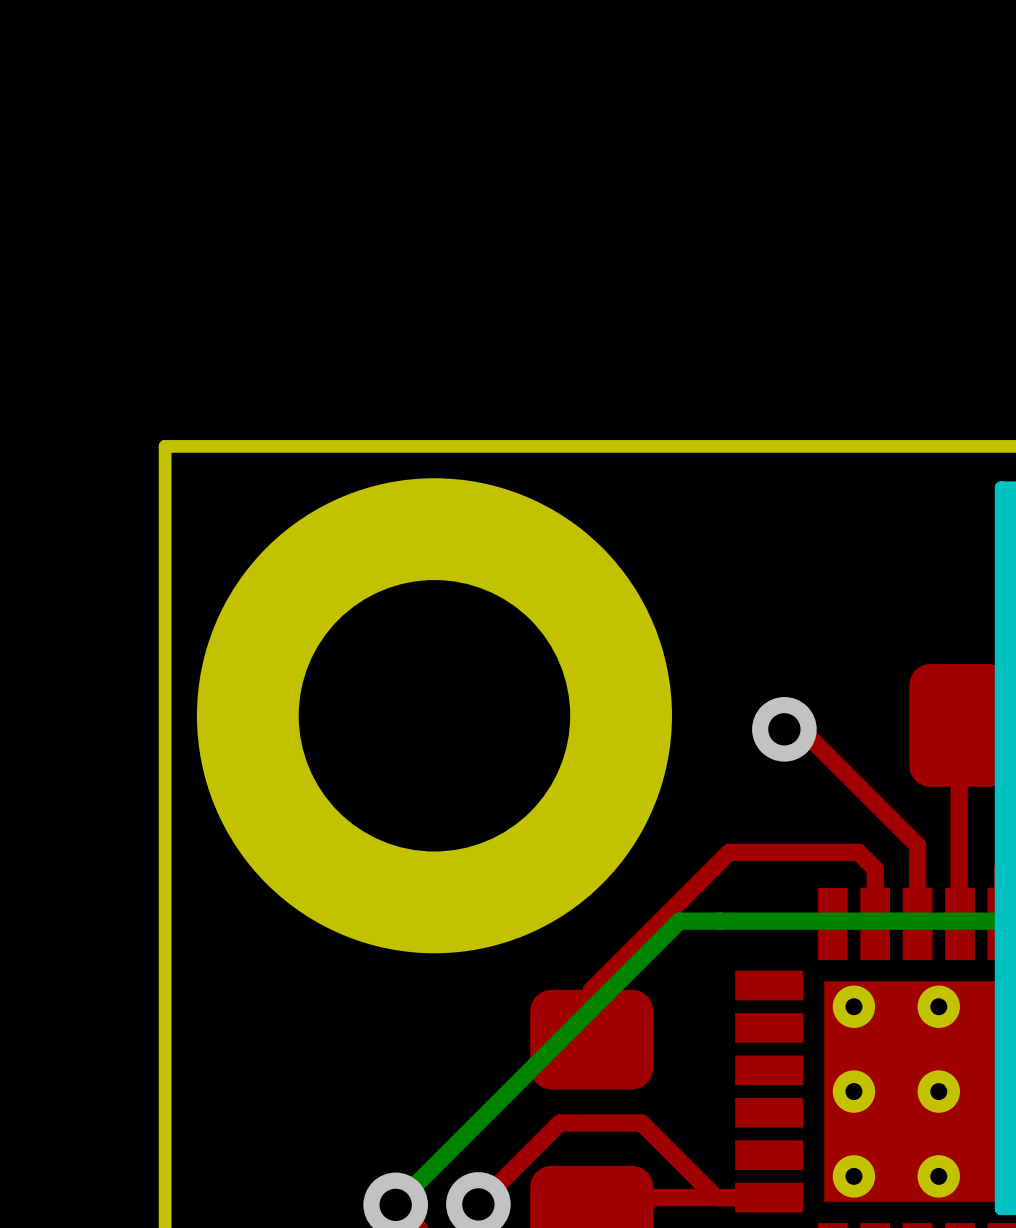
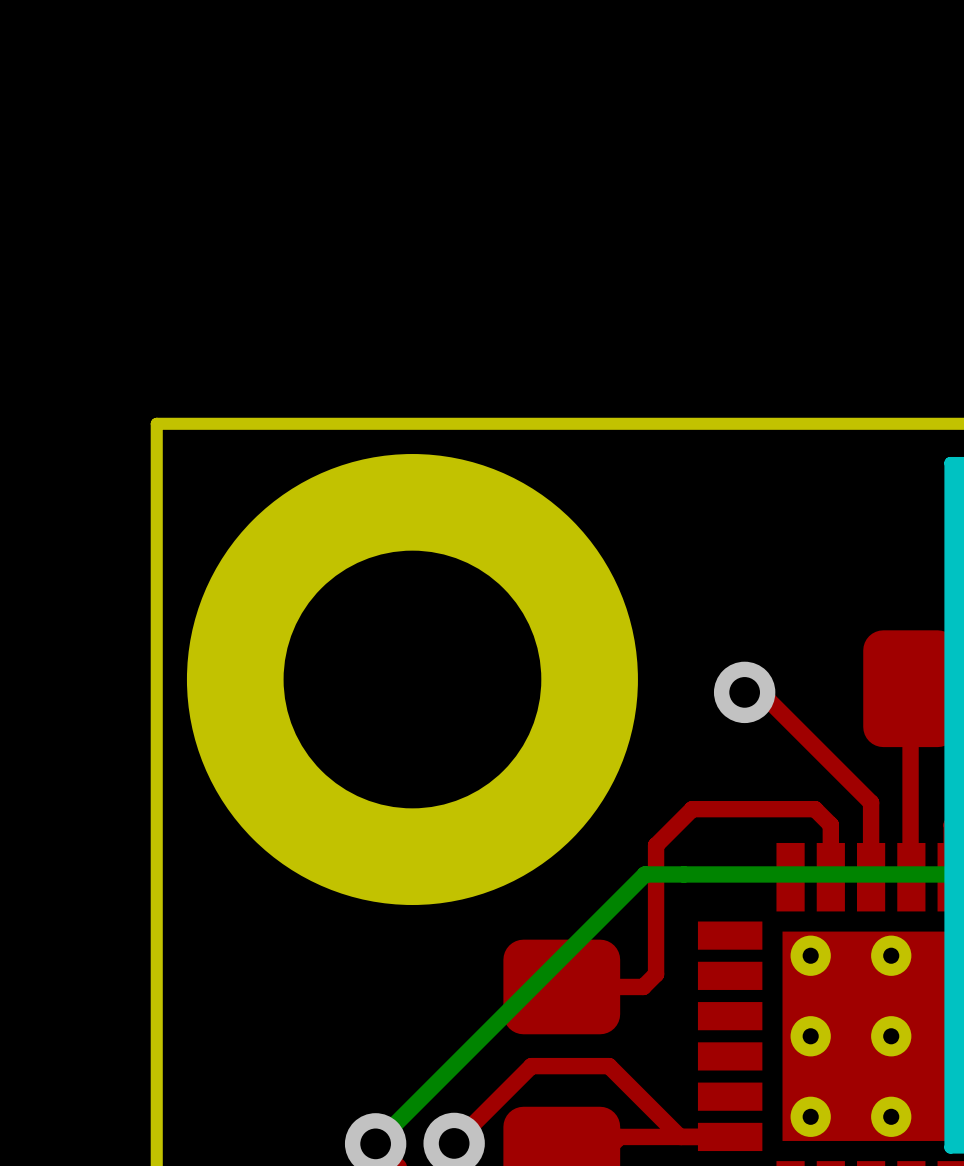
top track: (691, 890) (591, 989) (591, 1039) -> (656, 845) (656, 974) (643, 986) (561, 986)

